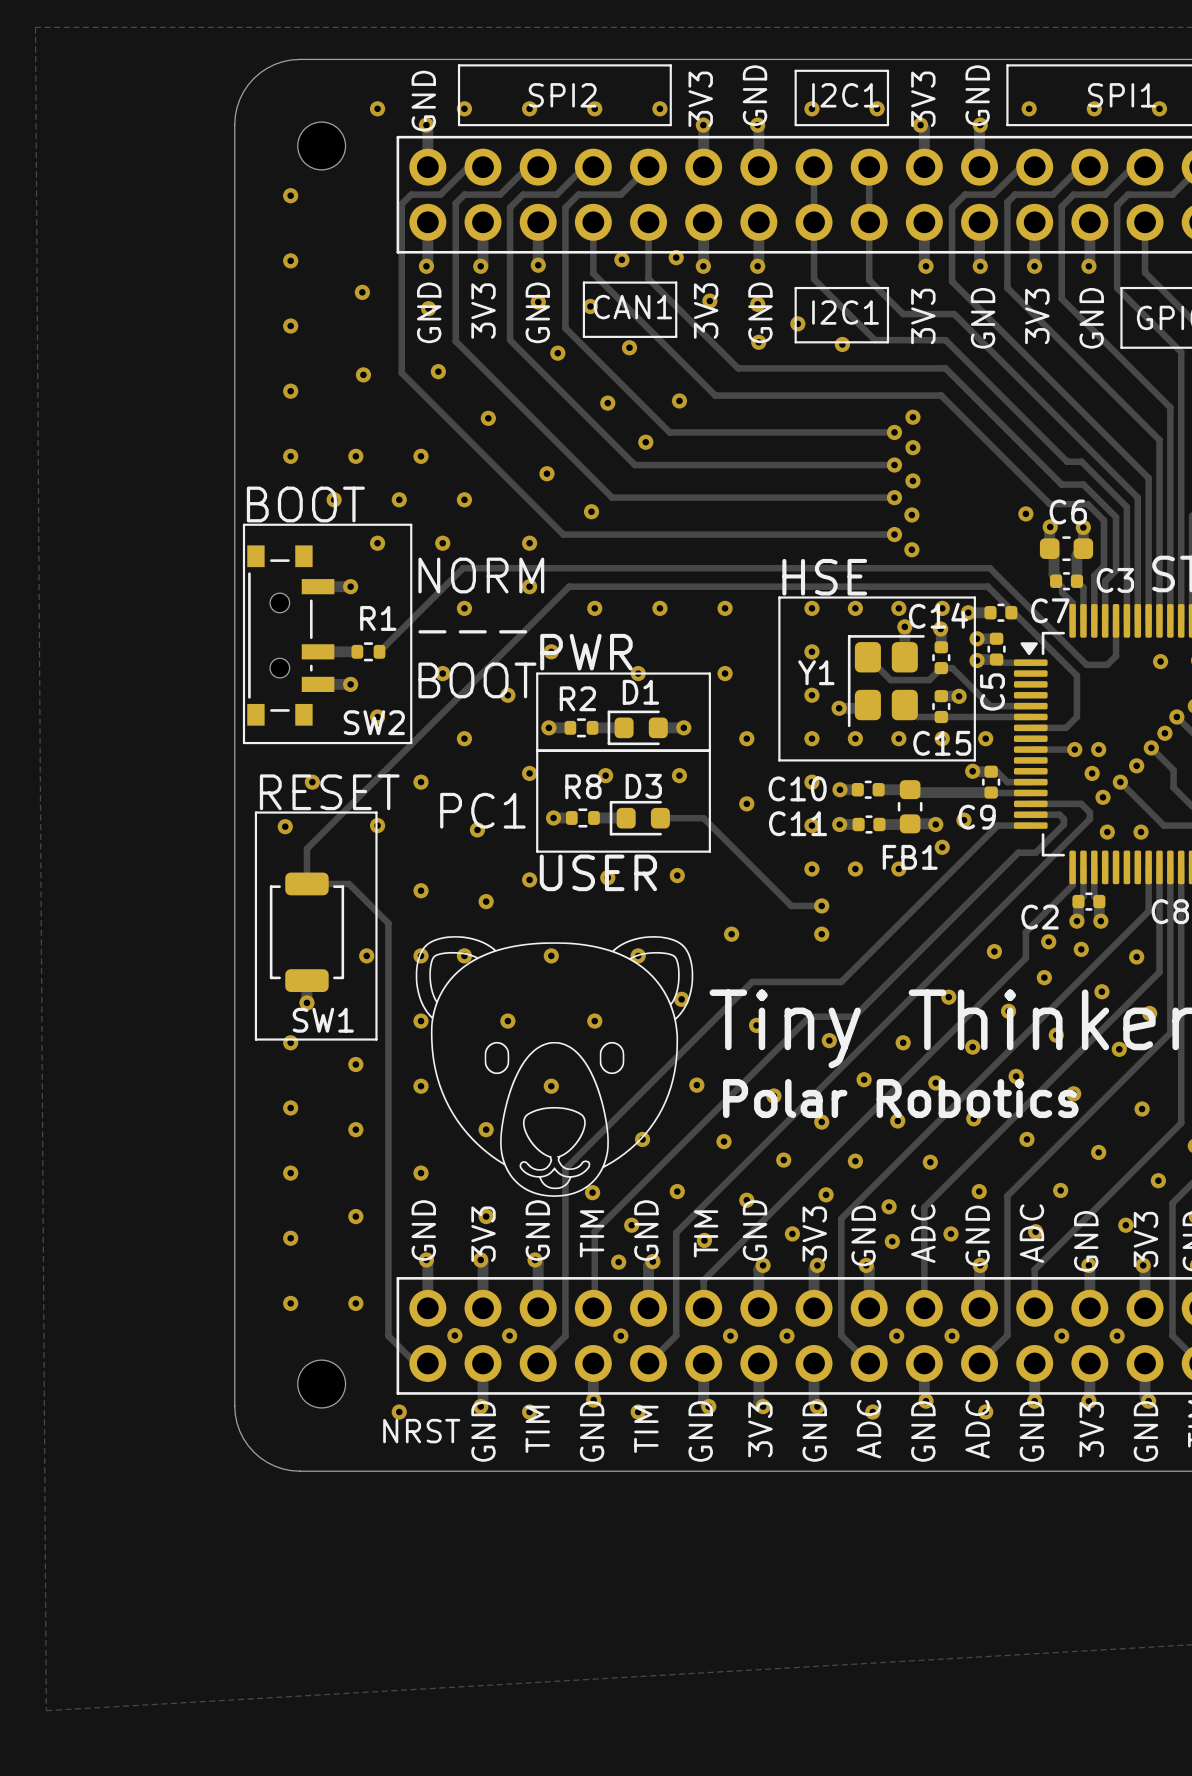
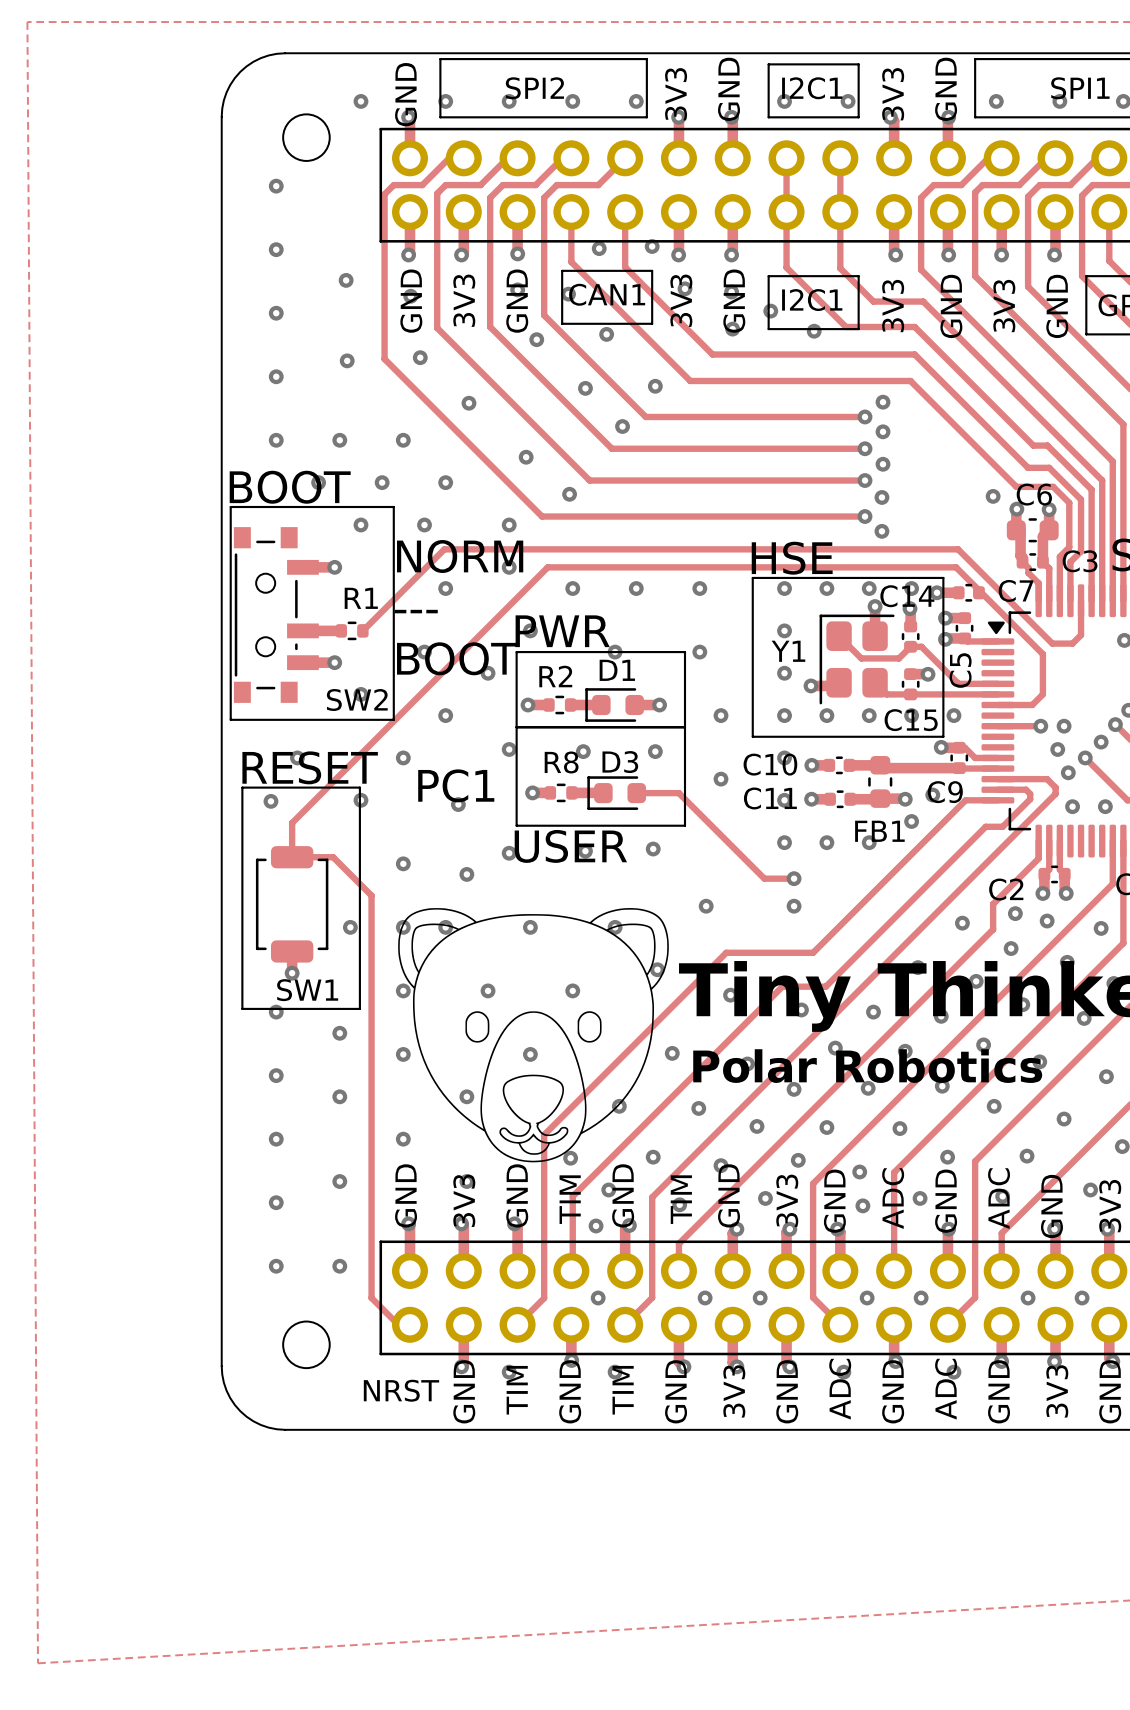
via: (454, 1335) -> none
via: (509, 1335) -> none
via: (399, 1412) -> none

